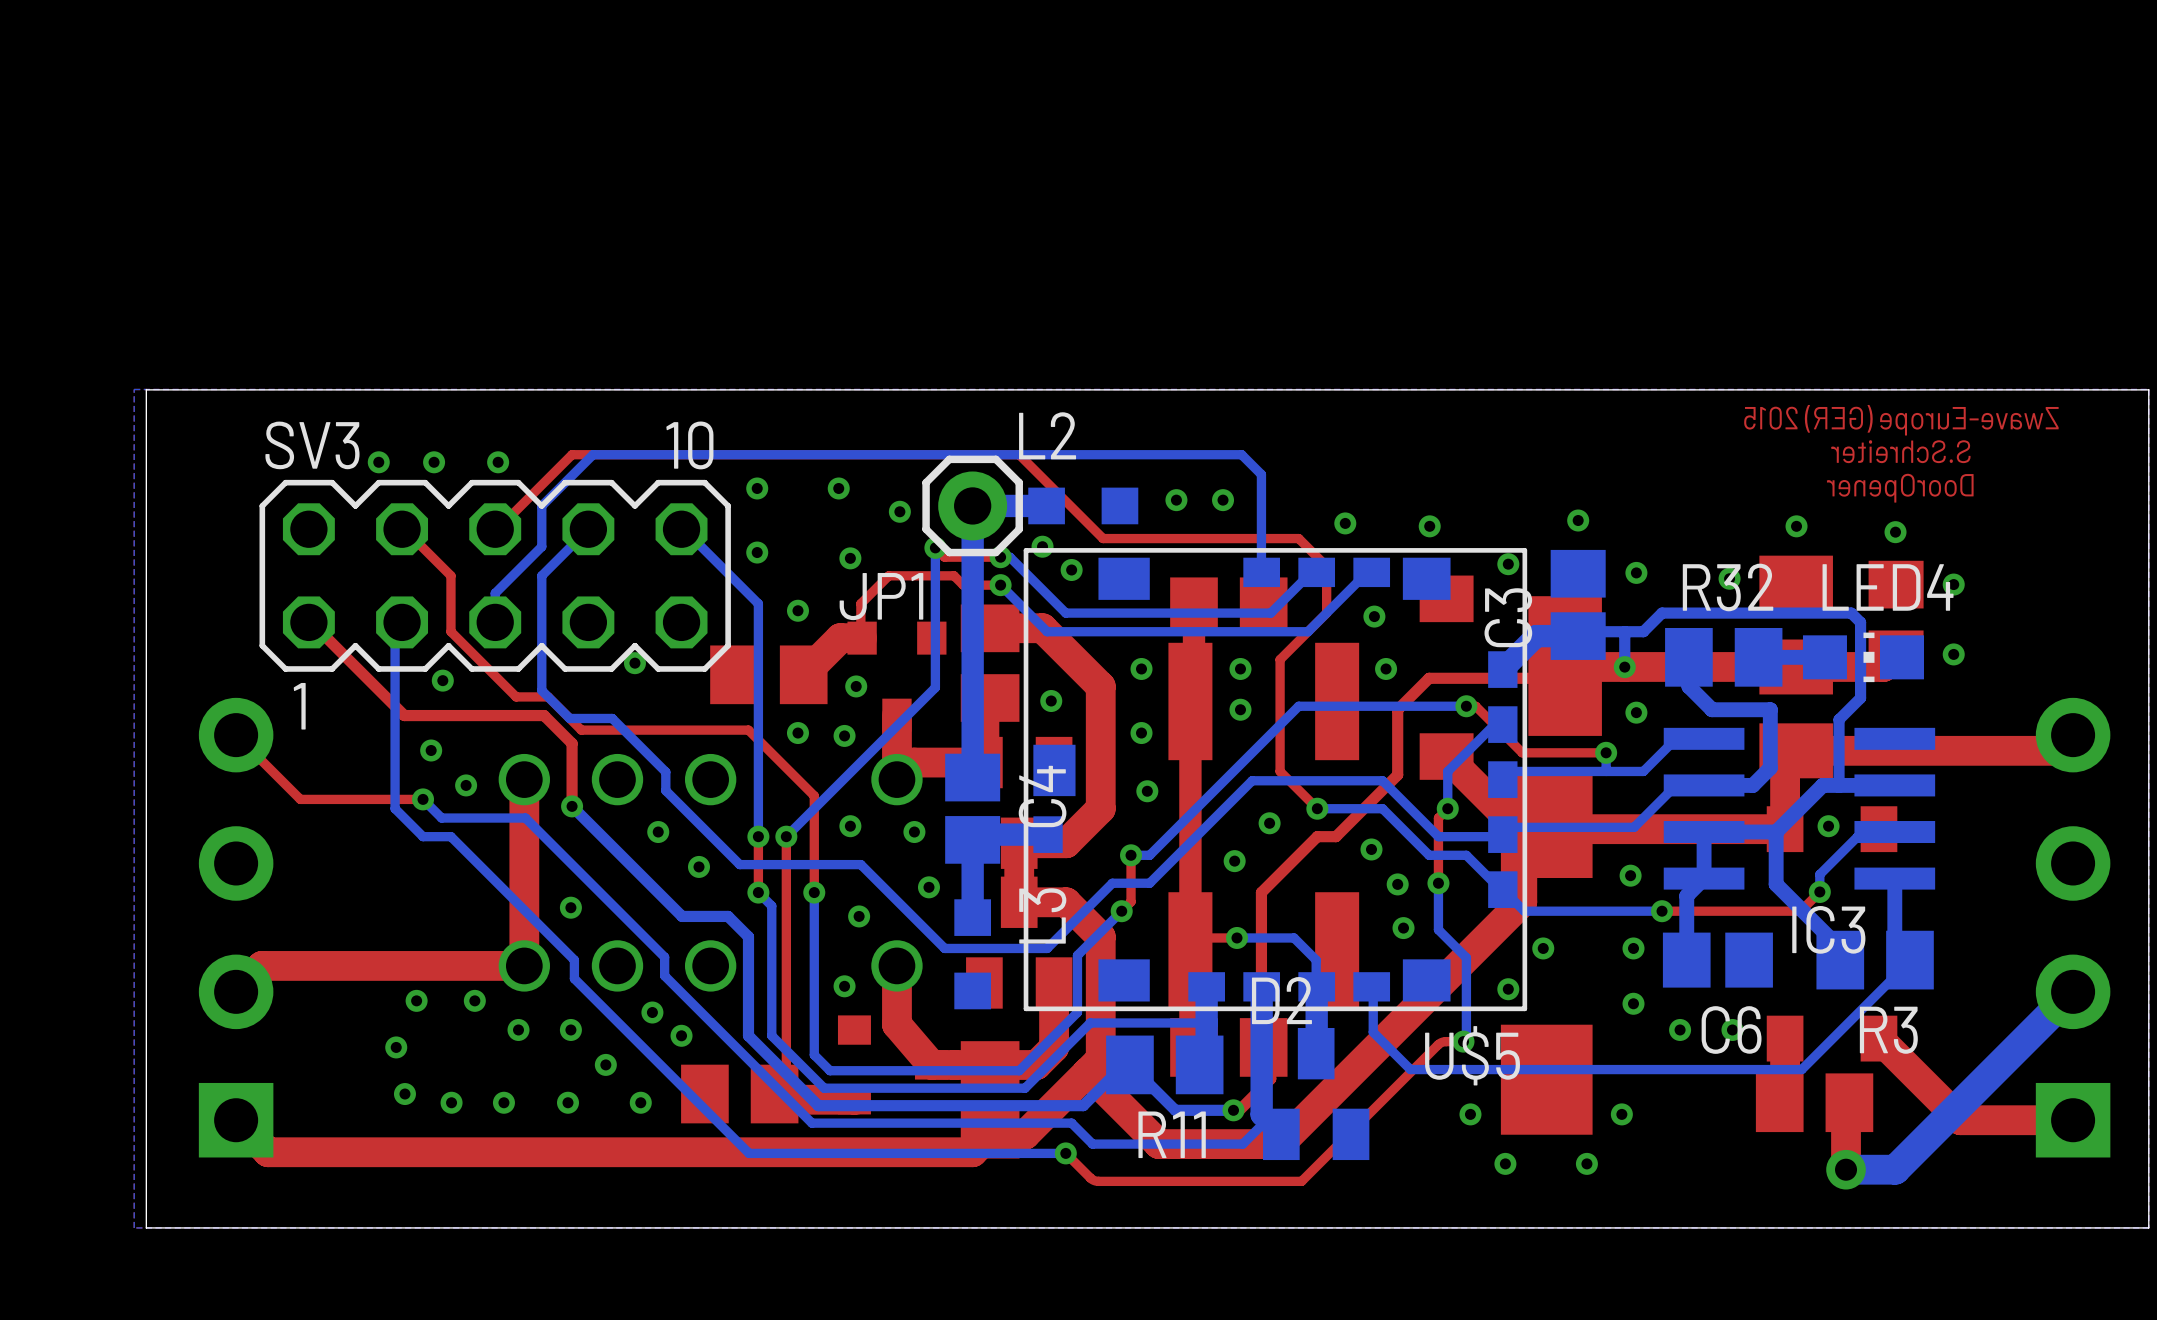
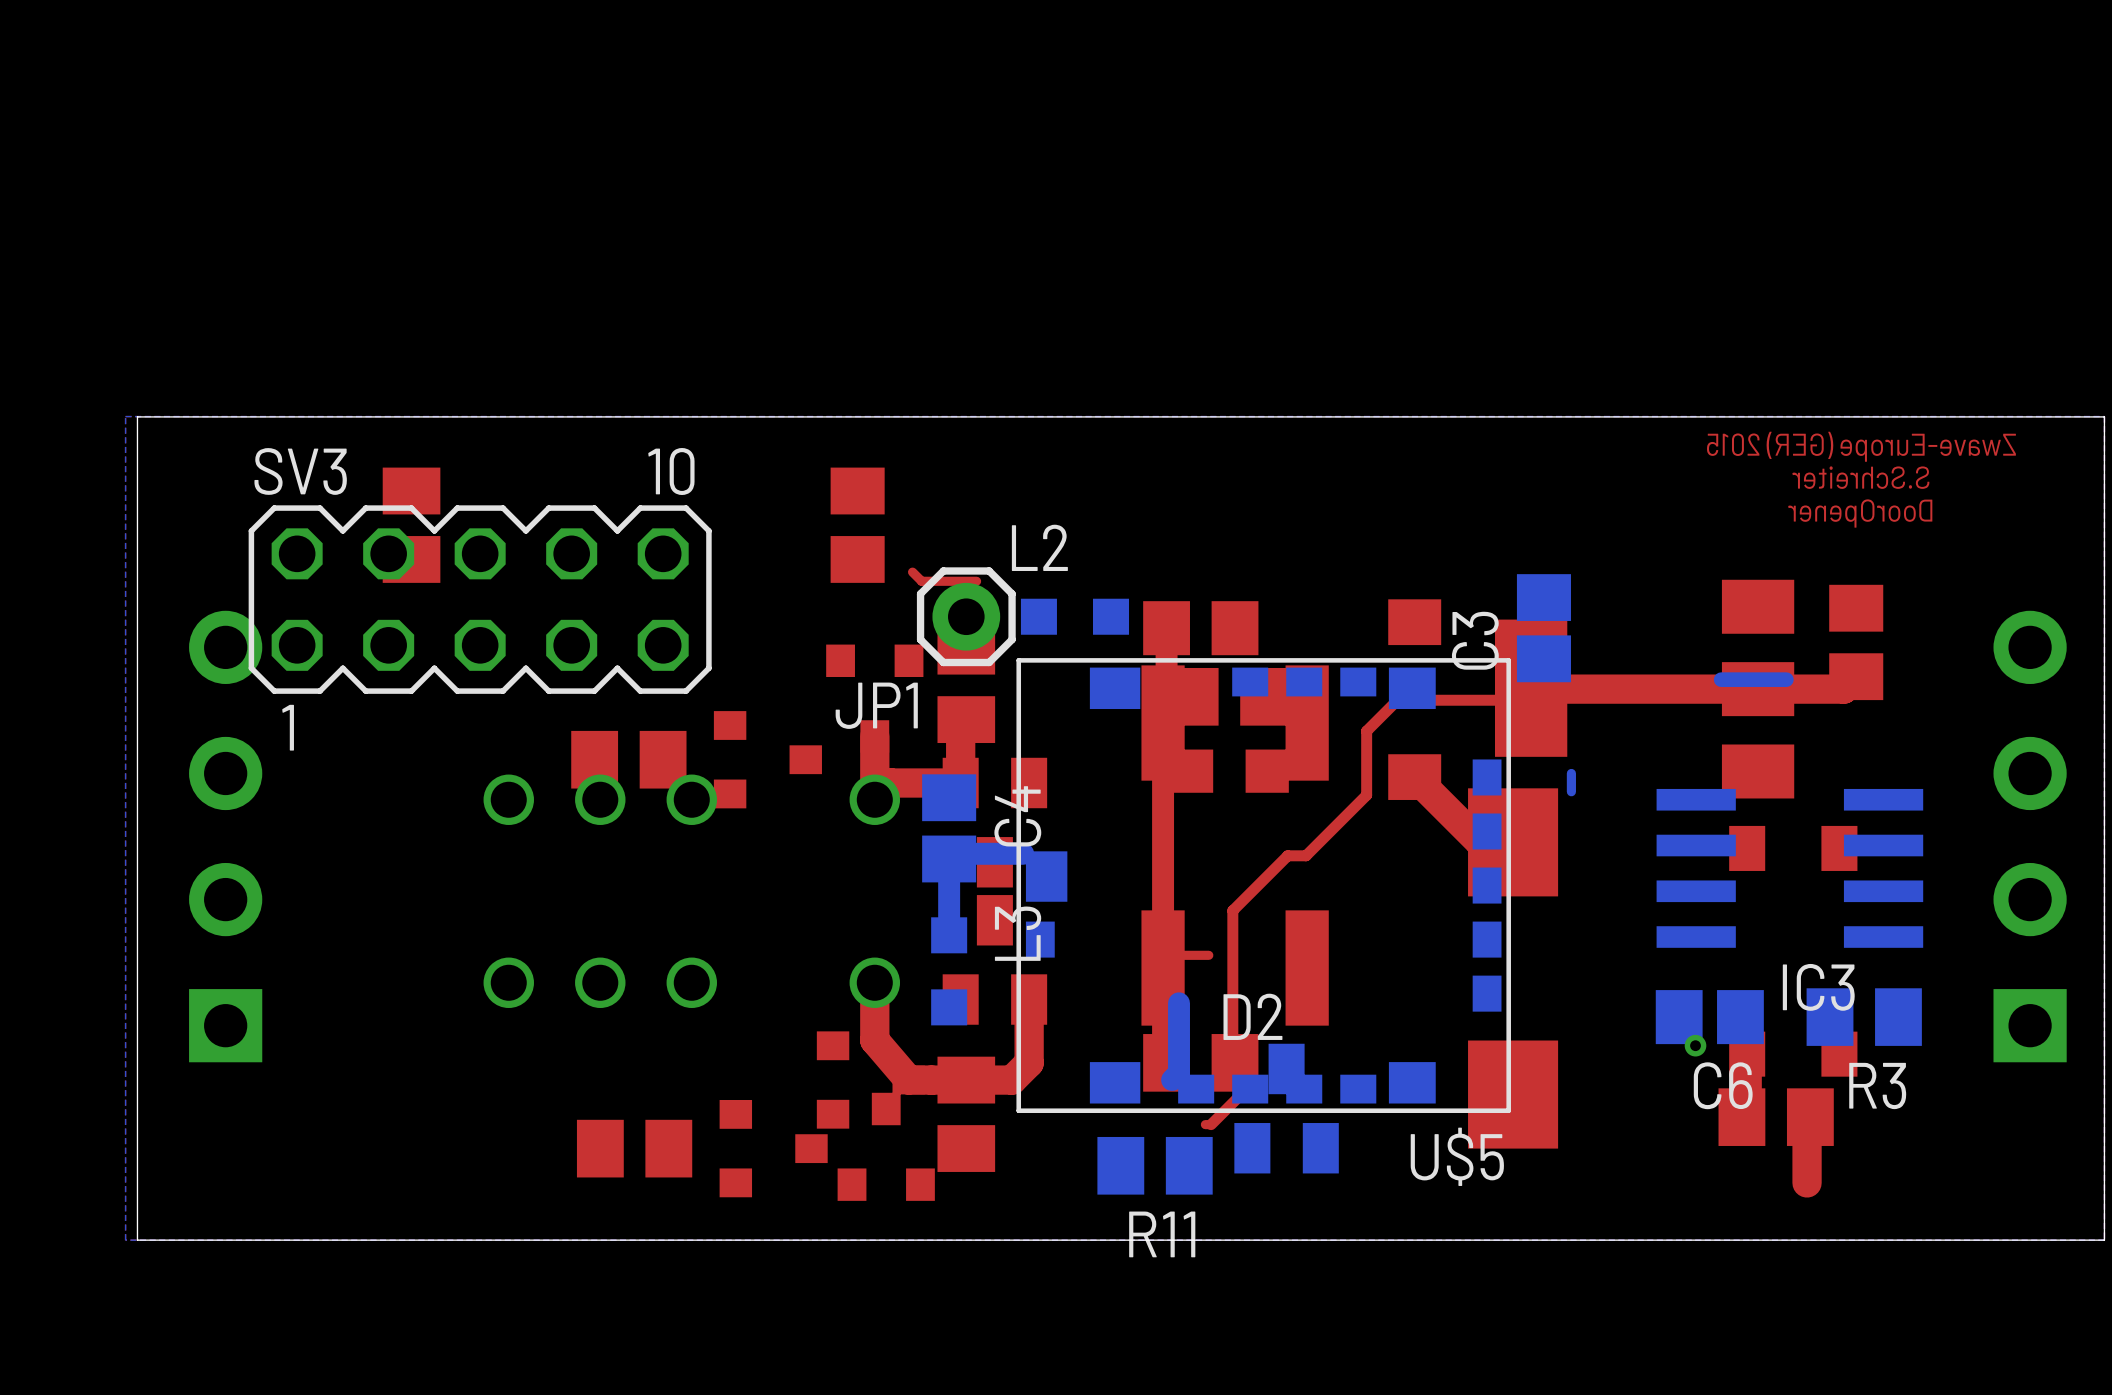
via: (378, 462) -> none
via: (434, 462) -> none
via: (498, 462) -> none
via: (757, 488) -> none
via: (838, 488) -> none
part: none -> (411, 525)
part: none -> (857, 525)
via: (1176, 500) -> none
via: (1223, 500) -> none
JP1 position: (972, 505) -> (966, 616)
bottom track: (1046, 505) (972, 505) (972, 777) -> none
L2 position: (1083, 505) -> (1074, 616)
via: (899, 511) -> none
via: (1578, 520) -> none
via: (1345, 523) -> none
via: (1429, 526) -> none
via: (1796, 526) -> none
top track: (402, 529) (404, 529) (450, 575) (450, 631) (516, 696) (548, 696) (581, 730) (748, 730) (814, 795) (814, 892) -> none
top track: (495, 529) (497, 529) (572, 454) (1019, 454) (1103, 538) (1298, 538) (1326, 566) (1326, 613) (1280, 659) (1280, 771) (1317, 808) -> none
bottom track: (588, 529) (541, 575) (541, 690) (569, 718) (612, 718) (665, 772) (665, 790) (739, 864) (860, 864) (944, 948) (1047, 948) (1112, 883) (1149, 883) (1252, 780) (1382, 780) (1438, 836) (1494, 836) (1502, 834) (1503, 827) (1634, 827) (1671, 790) (1699, 790) (1704, 785) (1752, 785) (1770, 767) (1770, 709) (1712, 709) (1688, 686) (1688, 657) -> none
bottom track: (681, 529) (683, 529) (758, 603) (758, 836) -> none
via: (1895, 532) -> none
via: (1042, 546) -> none
bottom track: (935, 547) (935, 687) (786, 836) -> none
via: (935, 547) -> none
via: (757, 552) -> none
bottom track: (1000, 557) (1009, 557) (1065, 613) (1270, 613) (1308, 575) (1316, 572) -> none
via: (1000, 557) -> none
via: (850, 558) -> none
via: (1508, 564) -> none
via: (1071, 570) -> none
bottom track: (1261, 572) (1261, 474) (1241, 454) (593, 454) (541, 505) (541, 546) (495, 593) (495, 622) -> none
bottom track: (1371, 572) (1363, 575) (1308, 631) (1047, 631) (1000, 585) -> none
via: (1636, 572) -> none
via: (1729, 578) -> none
via: (1953, 584) -> none
top track: (1000, 585) (963, 585) (954, 575) (888, 575) (860, 603) (862, 638) (840, 638) (803, 674) -> none
via: (1000, 585) -> none
via: (797, 610) -> none
via: (1374, 616) -> none
top track: (308, 622) (311, 622) (404, 715) (544, 715) (572, 743) (572, 806) -> none
bottom track: (402, 622) (395, 622) (395, 808) (423, 836) (450, 836) (574, 960) (574, 978) (749, 1153) (1065, 1153) -> none
top track: (990, 628) (1042, 628) (1100, 686) (1100, 808) (1066, 843) (1019, 843) (1019, 902) (1066, 902) (1100, 936) (1100, 1059) (1025, 1134) (990, 1134) (972, 1152) (268, 1152) (236, 1120) -> none
bottom track: (1624, 631) (1624, 667) -> none
via: (1953, 654) -> none
R32 side: bottom (1723, 657) -> top (1229, 696)
LED4 side: bottom (1863, 657) -> top (1229, 771)
via: (634, 663) -> none
via: (1624, 667) -> none
via: (1141, 668) -> none
via: (1240, 668) -> none
via: (1386, 668) -> none
bottom track: (1502, 669) (1536, 636) (1578, 636) (1587, 631) (1643, 631) (1662, 613) (1851, 613) (1860, 622) (1860, 698) (1839, 719) (1839, 785) -> none
part position: (768, 674) -> (628, 759)
via: (442, 680) -> none
via: (856, 686) -> none
via: (1051, 701) -> none
top track: (1466, 706) (1475, 706) (1522, 752) (1606, 752) -> none
bottom track: (1466, 706) (1298, 706) (1149, 855) (1131, 855) -> none
via: (1466, 706) -> none
via: (1240, 709) -> none
via: (1636, 712) -> none
bottom track: (1502, 724) (1494, 724) (1447, 771) (1447, 808) -> none
via: (797, 733) -> none
via: (1141, 733) -> none
top track: (236, 735) (300, 799) (423, 799) -> none
via: (844, 735) -> none
top track: (2073, 735) (2057, 750) (1796, 750) (1785, 761) (1785, 829) (1552, 829) (1546, 822) (1522, 836) (1522, 901) (1280, 1144) (1158, 1144) (1087, 1072) -> none
part: none -> (767, 759)
bottom track: (1704, 738) (1699, 743) (1671, 743) (1643, 771) (1503, 771) (1502, 779) -> none
via: (431, 750) -> none
via: (1606, 752) -> none
top track: (524, 779) (524, 965) (262, 965) (236, 991) -> none
U$5 position: (1275, 779) -> (1263, 885)
via: (466, 785) -> none
bottom track: (1894, 785) (1822, 785) (1776, 832) -> none
via: (1147, 791) -> none
bottom track: (423, 799) (441, 818) (525, 818) (664, 957) (664, 975) (811, 1123) (1071, 1123) (1092, 1144) (1242, 1144) (1266, 1119) -> none
via: (423, 799) -> none
bottom track: (572, 806) (682, 916) (728, 916) (748, 936) (748, 1035) (818, 1105) (1083, 1105) (1121, 1067) (1121, 1060) (1129, 1064) -> none
via: (572, 806) -> none
bottom track: (1317, 808) (1382, 808) (1429, 855) (1466, 855) (1502, 889) -> none
via: (1317, 808) -> none
top track: (1447, 808) (1438, 818) (1438, 883) -> none
via: (1447, 808) -> none
IC3 position: (1799, 808) -> (1789, 868)
via: (1269, 823) -> none
via: (850, 826) -> none
via: (1828, 826) -> none
via: (658, 832) -> none
via: (914, 832) -> none
bottom track: (1776, 832) (1704, 832) (1704, 878) (1686, 895) (1686, 960) -> none
bottom track: (1776, 832) (1776, 884) (1840, 948) (1840, 960) -> none
bottom track: (1894, 832) (1885, 836) (1857, 836) (1819, 874) (1819, 891) -> none
top track: (758, 836) (758, 892) -> none
via: (758, 836) -> none
top track: (786, 836) (786, 1069) (767, 1088) (786, 1099) (856, 1099) -> none
via: (786, 836) -> none
via: (1371, 849) -> none
top track: (1131, 855) (1131, 901) (1121, 911) -> none
via: (1131, 855) -> none
via: (1234, 861) -> none
via: (699, 866) -> none
via: (1630, 875) -> none
bottom track: (1894, 878) (1894, 933) (1909, 960) (1801, 1069) (1410, 1069) (1373, 1032) (1371, 986) -> none
bottom track: (1438, 883) (1438, 929) (1466, 957) (1466, 1034) (1463, 1041) -> none
via: (1438, 883) -> none
via: (1397, 884) -> none
via: (928, 887) -> none
bottom track: (1502, 889) (1524, 911) (1662, 911) -> none
top track: (1819, 891) (1800, 911) (1662, 911) -> none
via: (1819, 891) -> none
bottom track: (758, 892) (771, 905) (771, 1035) (824, 1088) (1025, 1088) (1090, 1022) (1206, 1022) -> none
via: (758, 892) -> none
bottom track: (814, 892) (814, 1055) (830, 1070) (1019, 1070) (1077, 1012) (1077, 955) (1121, 911) -> none
via: (814, 892) -> none
via: (570, 907) -> none
via: (1121, 911) -> none
via: (1662, 911) -> none
via: (859, 916) -> none
part position: (236, 927) -> (225, 836)
part position: (2073, 927) -> (2030, 836)
via: (1403, 928) -> none
bottom track: (1236, 937) (1294, 937) (1316, 960) (1316, 985) (1308, 985) (1316, 986) (1316, 1053) -> none
via: (1236, 937) -> none
via: (1543, 948) -> none
via: (1633, 948) -> none
C6 position: (1717, 960) -> (1709, 1017)
R3 position: (1875, 960) -> (1864, 1017)
via: (844, 986) -> none
bottom track: (1261, 986) (1261, 1114) (1281, 1134) -> none
via: (1508, 989) -> none
bottom track: (2073, 991) (1895, 1169) (1846, 1169) -> none
via: (416, 1000) -> none
via: (474, 1000) -> none
via: (1633, 1003) -> none
via: (652, 1012) -> none
via: (518, 1029) -> none
via: (570, 1029) -> none
via: (1680, 1029) -> none
via: (681, 1035) -> none
top track: (1878, 1038) (1960, 1120) (2073, 1120) -> none
top track: (1463, 1041) (1444, 1041) (1439, 1044) (1301, 1181) (1097, 1181) (1090, 1177) (1065, 1153) -> none
via: (1463, 1041) -> none
via: (396, 1047) -> none
via: (605, 1064) -> none
bottom track: (1129, 1064) (1175, 1110) (1233, 1110) -> none
R11 position: (1164, 1064) -> (1155, 1165)
via: (404, 1094) -> none
part position: (739, 1094) -> (634, 1148)
via: (451, 1102) -> none
via: (503, 1102) -> none
via: (568, 1102) -> none
via: (640, 1102) -> none
via: (1233, 1110) -> none
via: (1470, 1114) -> none
via: (1621, 1114) -> none
part: none -> (886, 1146)
part: none -> (773, 1148)
via: (1065, 1153) -> none
via: (1505, 1163) -> none
via: (1586, 1163) -> none
via: (1846, 1169) -> none

